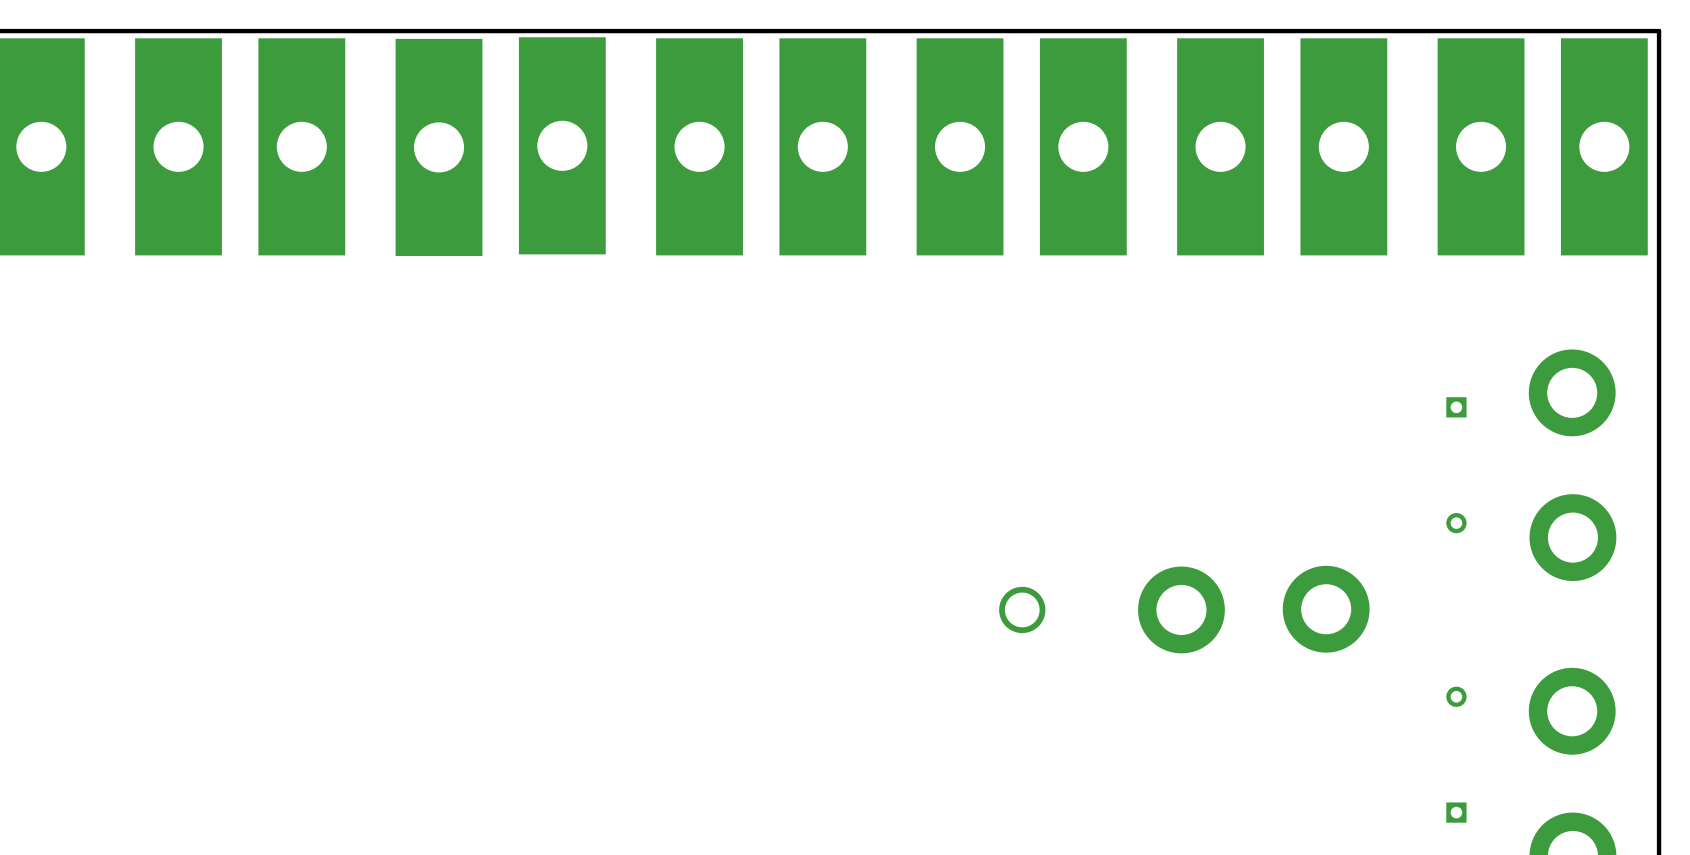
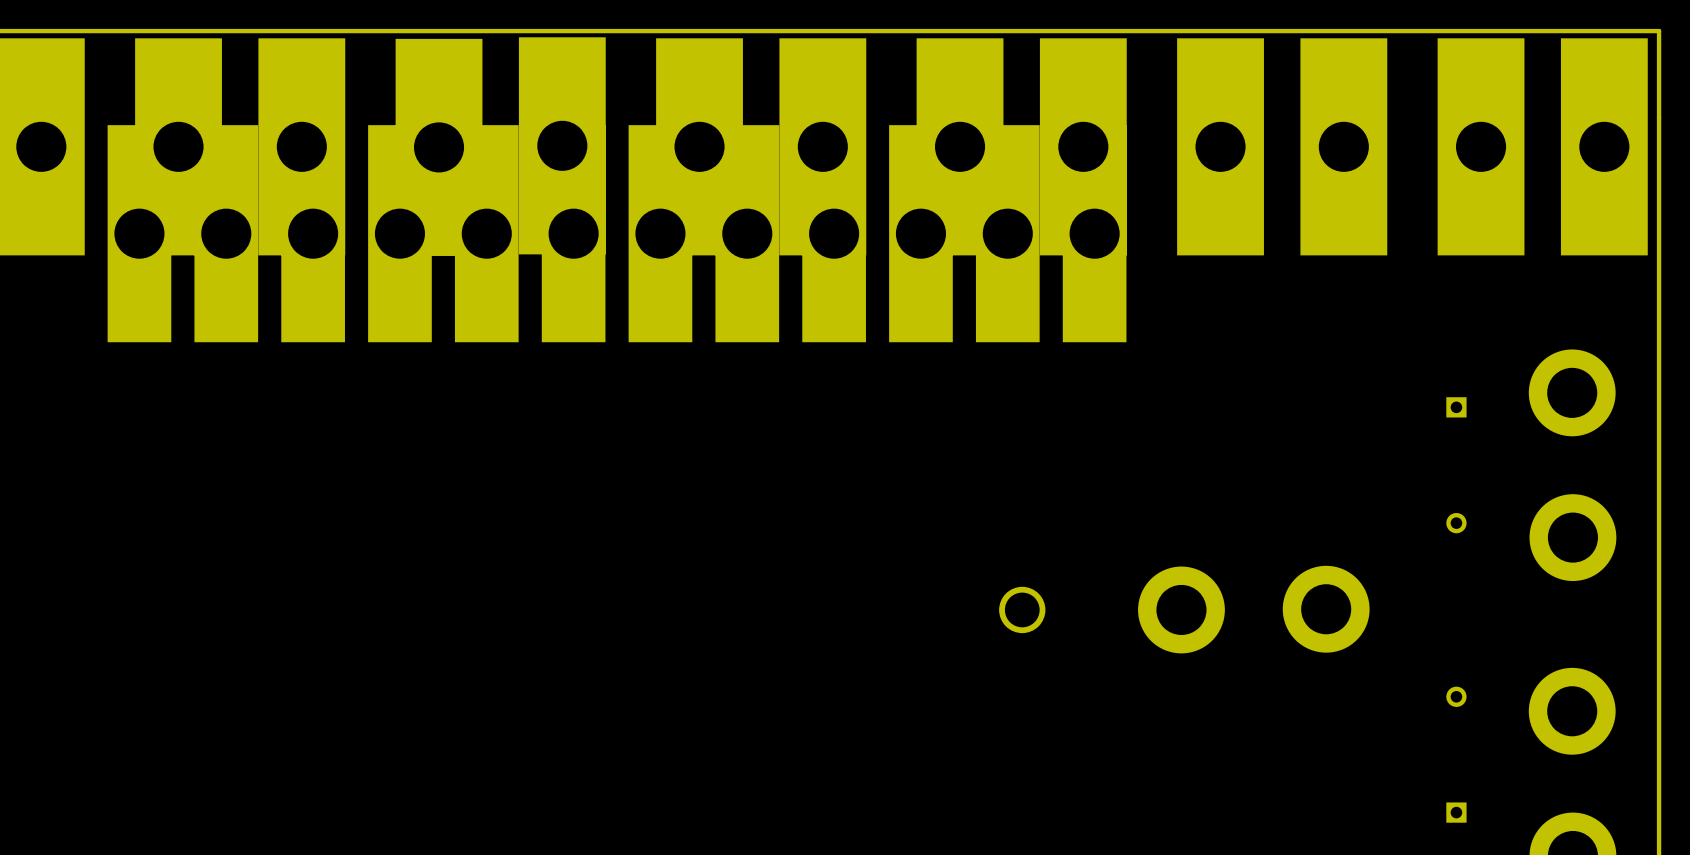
part: none -> (182, 233)
part: none -> (356, 233)
part: none -> (530, 233)
part: none -> (703, 233)
part: none -> (877, 233)
part: none -> (1051, 233)

